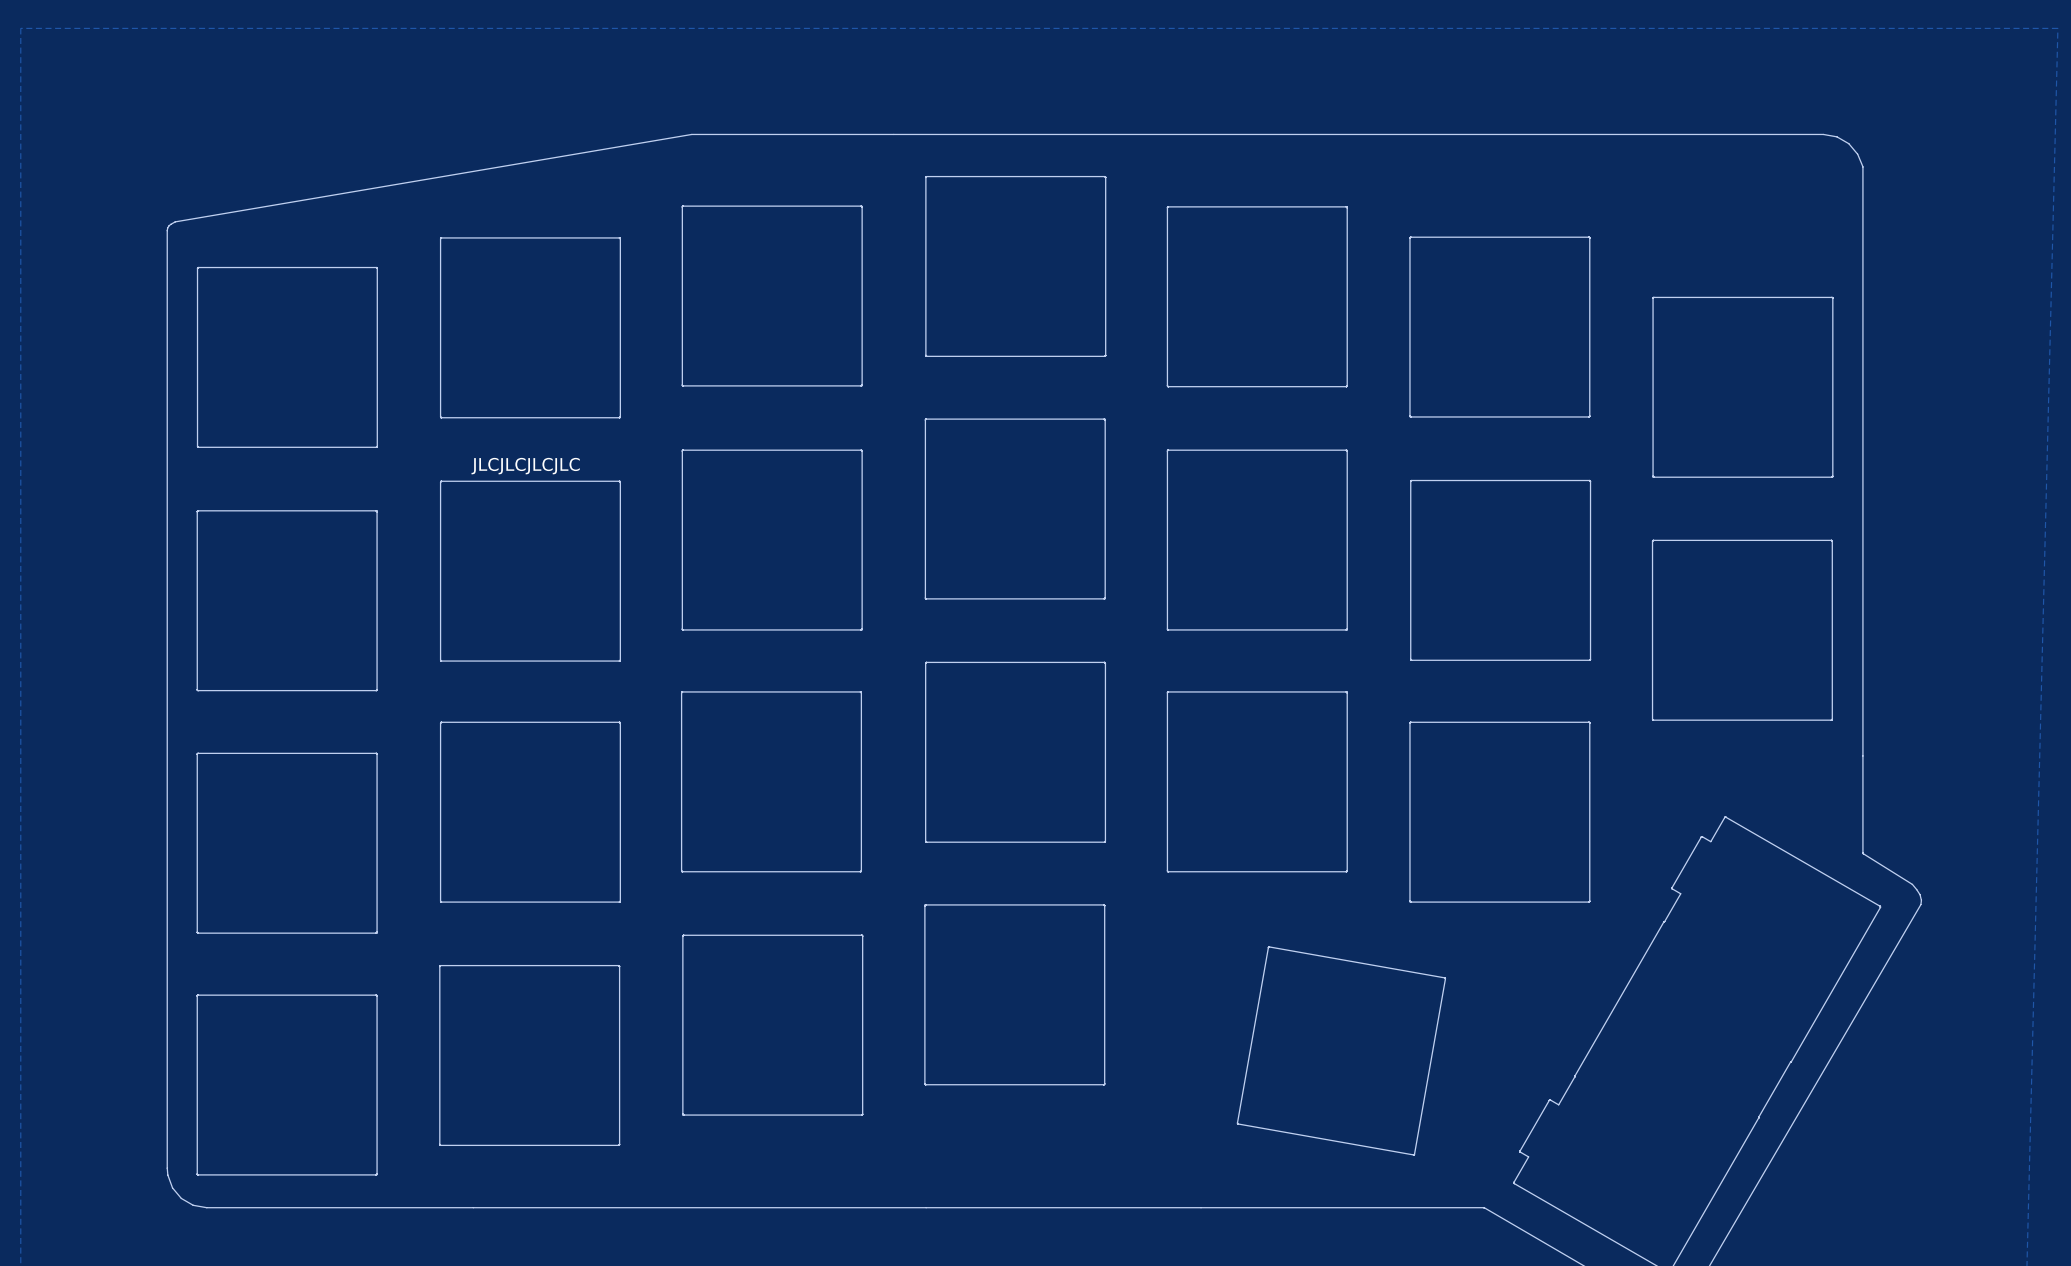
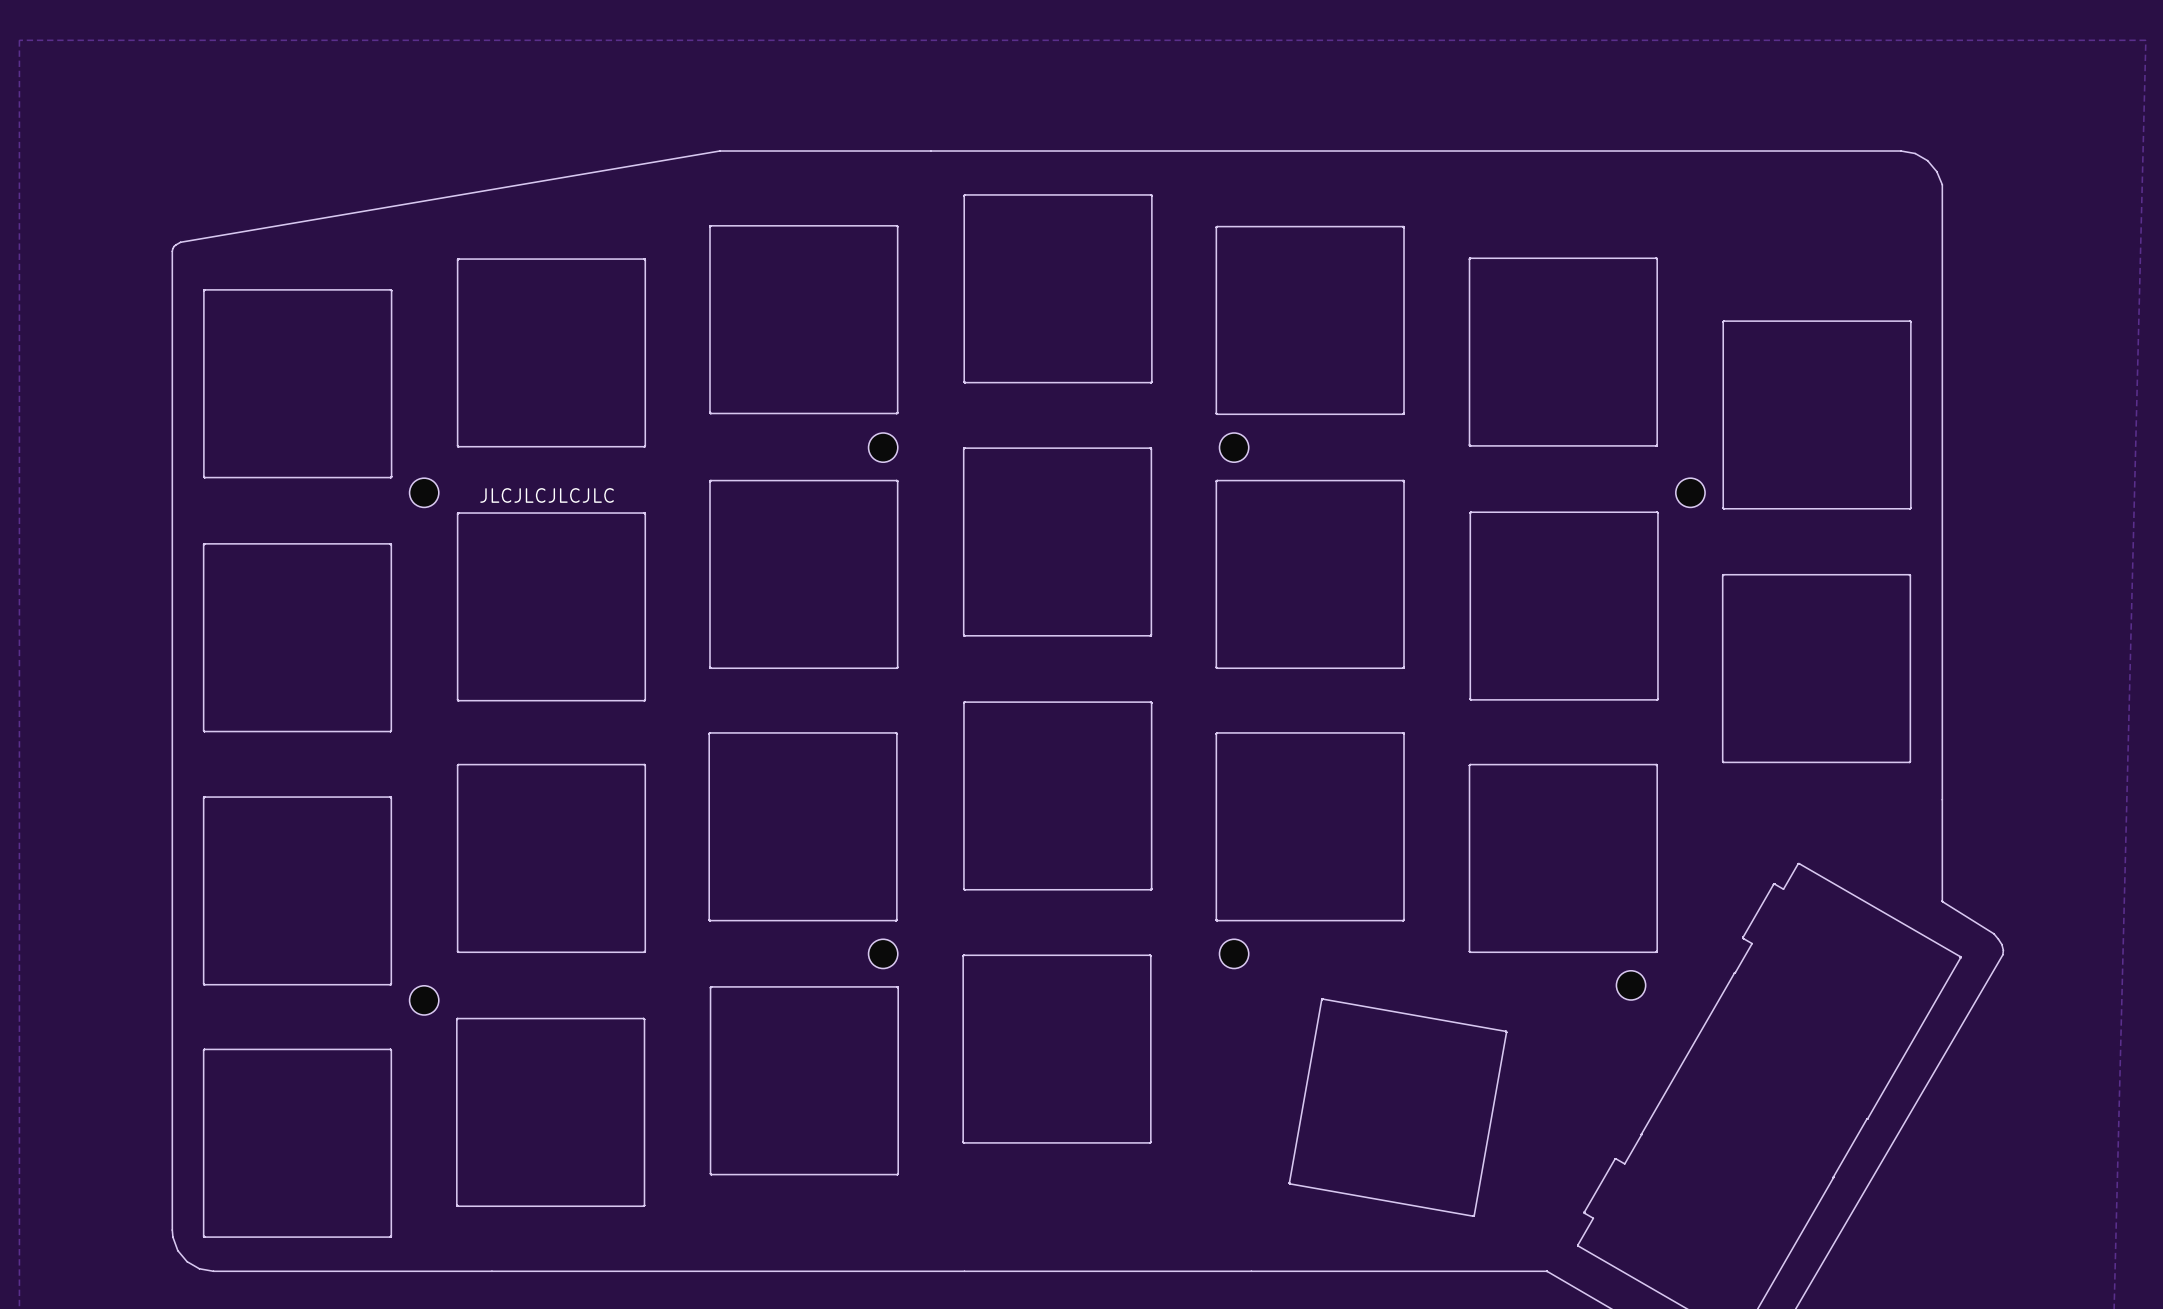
part: none -> (883, 447)
part: none -> (1234, 447)
part: none -> (424, 492)
part: none -> (1690, 492)
part: none -> (883, 953)
part: none -> (1234, 953)
part: none -> (1631, 985)
part: none -> (424, 1000)

